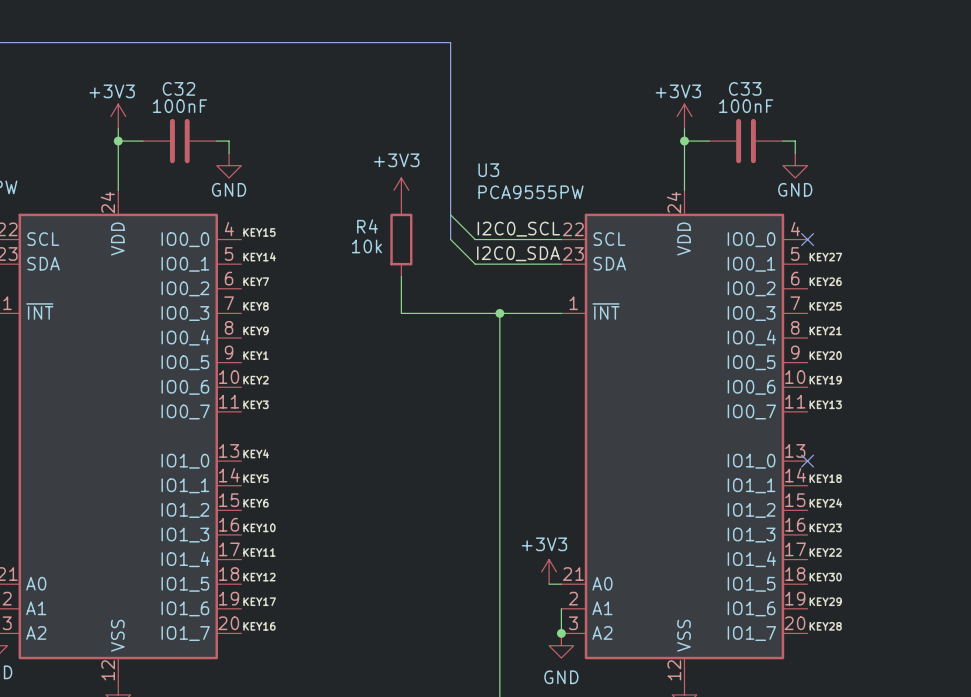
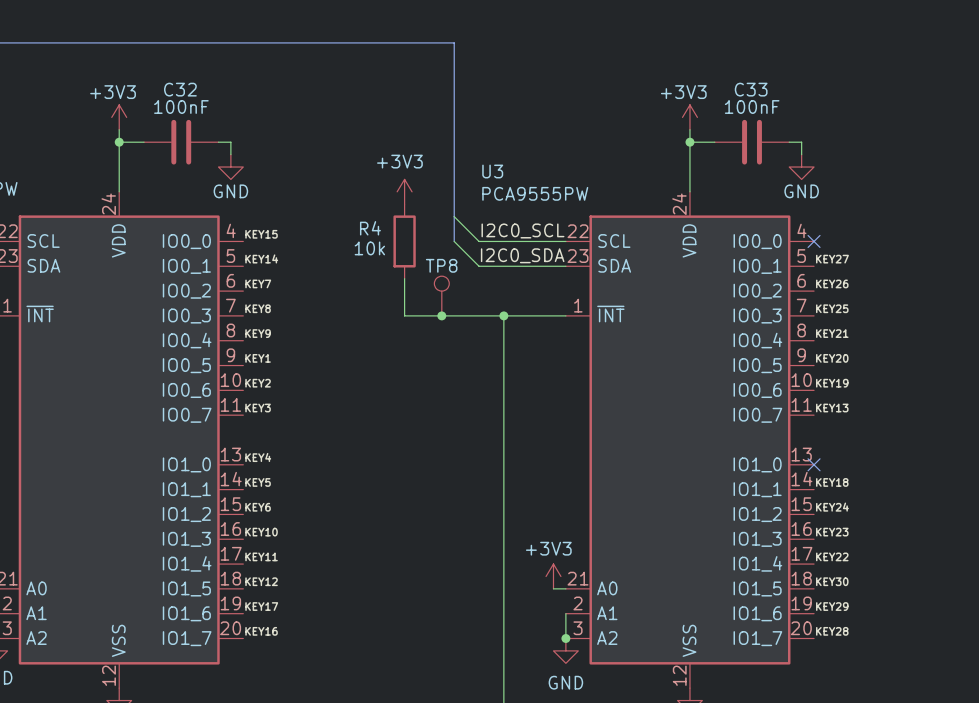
TP8: none -> (441, 296)
junction: none -> (441, 315)

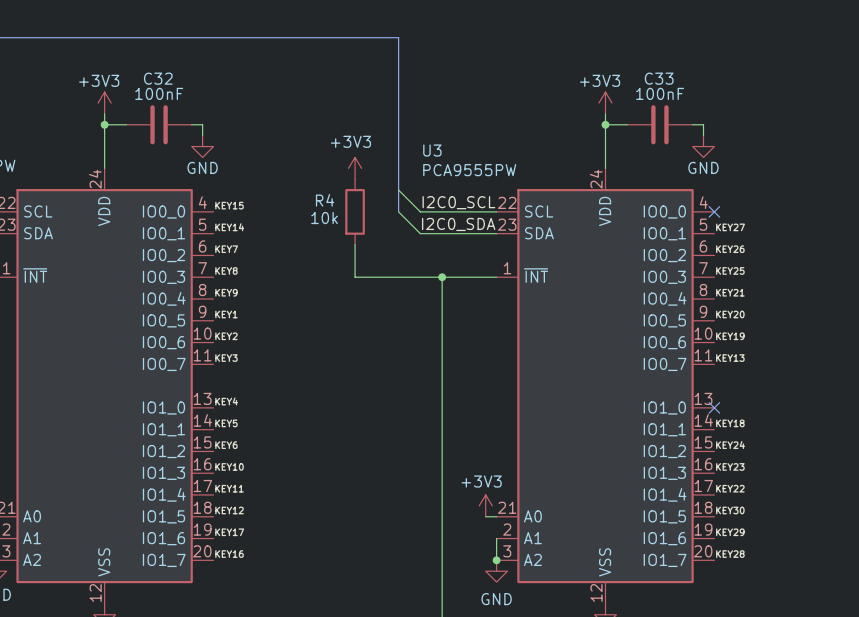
TP8: (441, 296) -> none
junction: (441, 315) -> none

